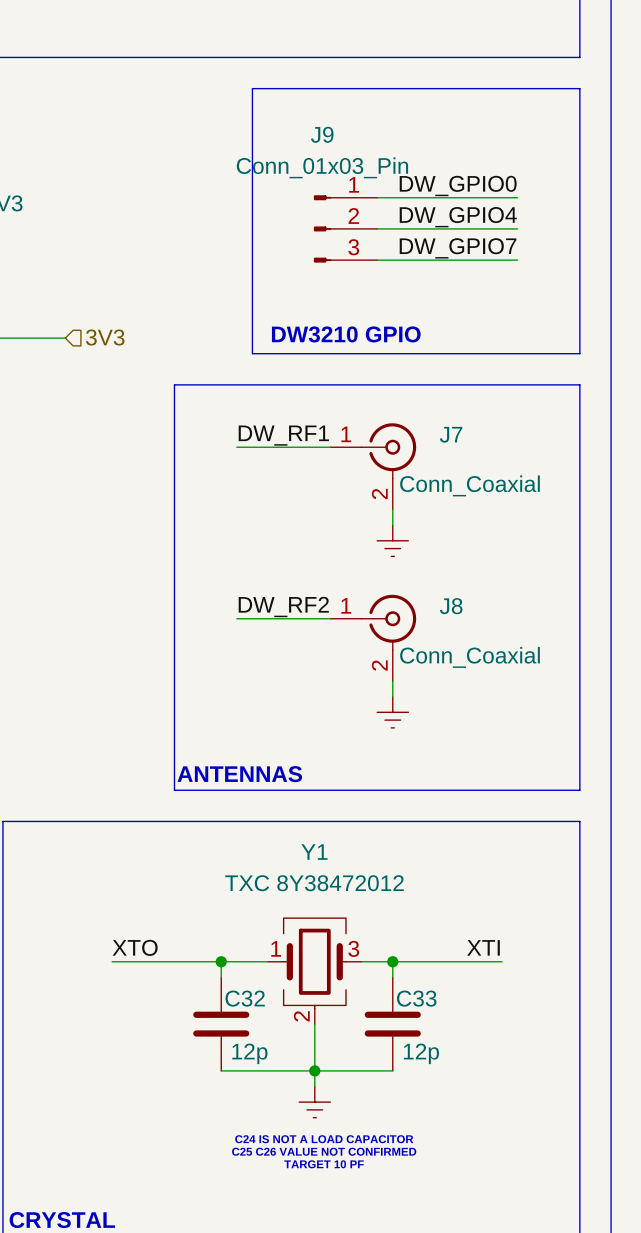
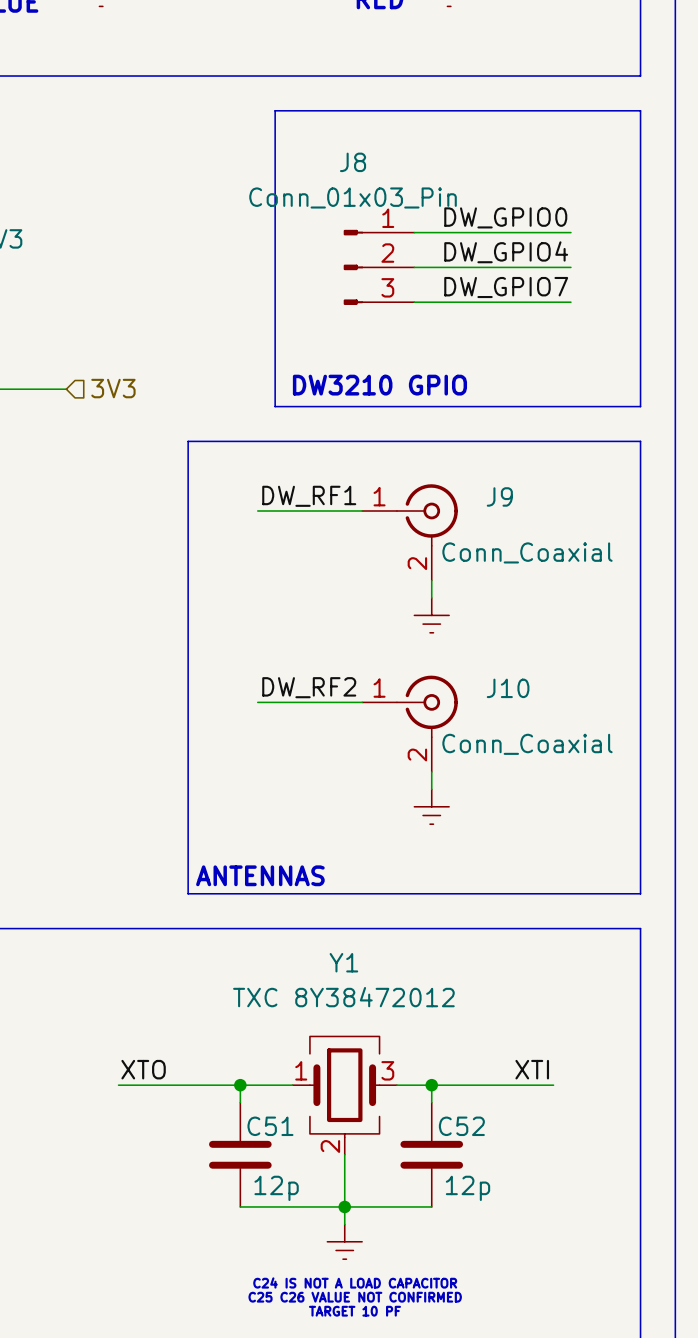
J9 name: J9 (322, 134) -> J8 (353, 162)
J7 name: J7 (451, 434) -> J9 (499, 496)
J8 name: J8 (451, 606) -> J10 (508, 688)
C32 name: C32 (245, 998) -> C51 (270, 1126)
C33 name: C33 (416, 998) -> C52 (461, 1126)

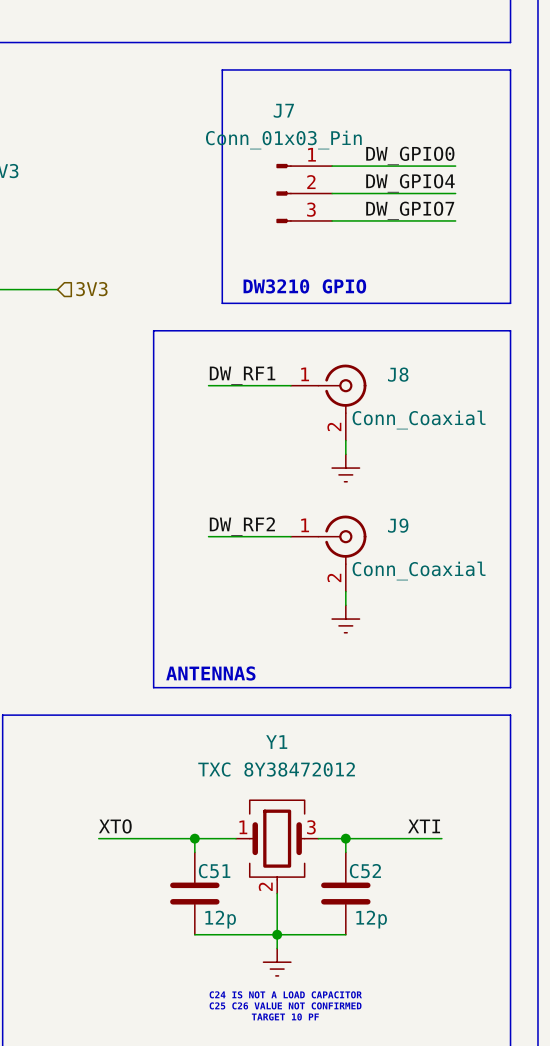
J8 name: J8 (353, 162) -> J7 (283, 110)
J9 name: J9 (499, 496) -> J8 (398, 374)
J10 name: J10 (508, 688) -> J9 (398, 525)

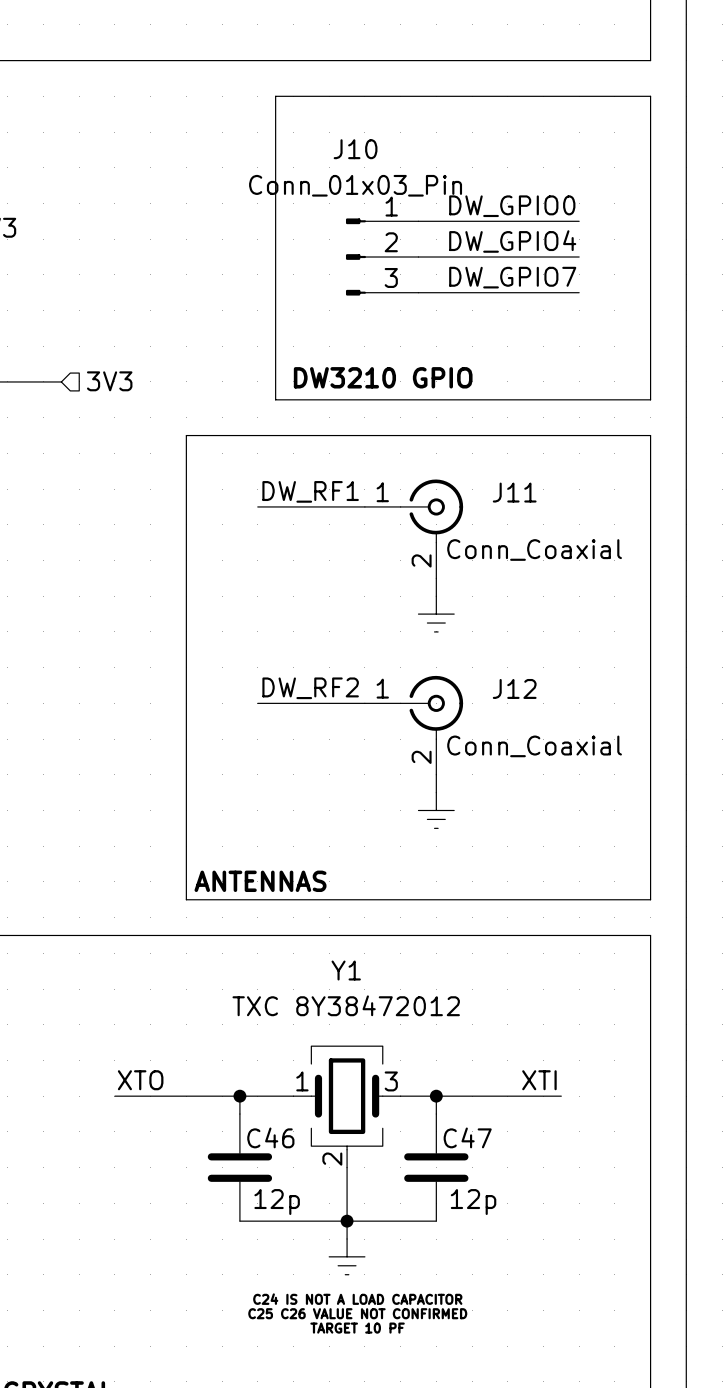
J7 name: J7 (283, 110) -> J10 (355, 149)
J8 name: J8 (398, 374) -> J11 (514, 492)
J9 name: J9 (398, 525) -> J12 (514, 688)
C51 name: C51 (214, 871) -> C46 (270, 1137)
C52 name: C52 (365, 871) -> C47 (467, 1137)

